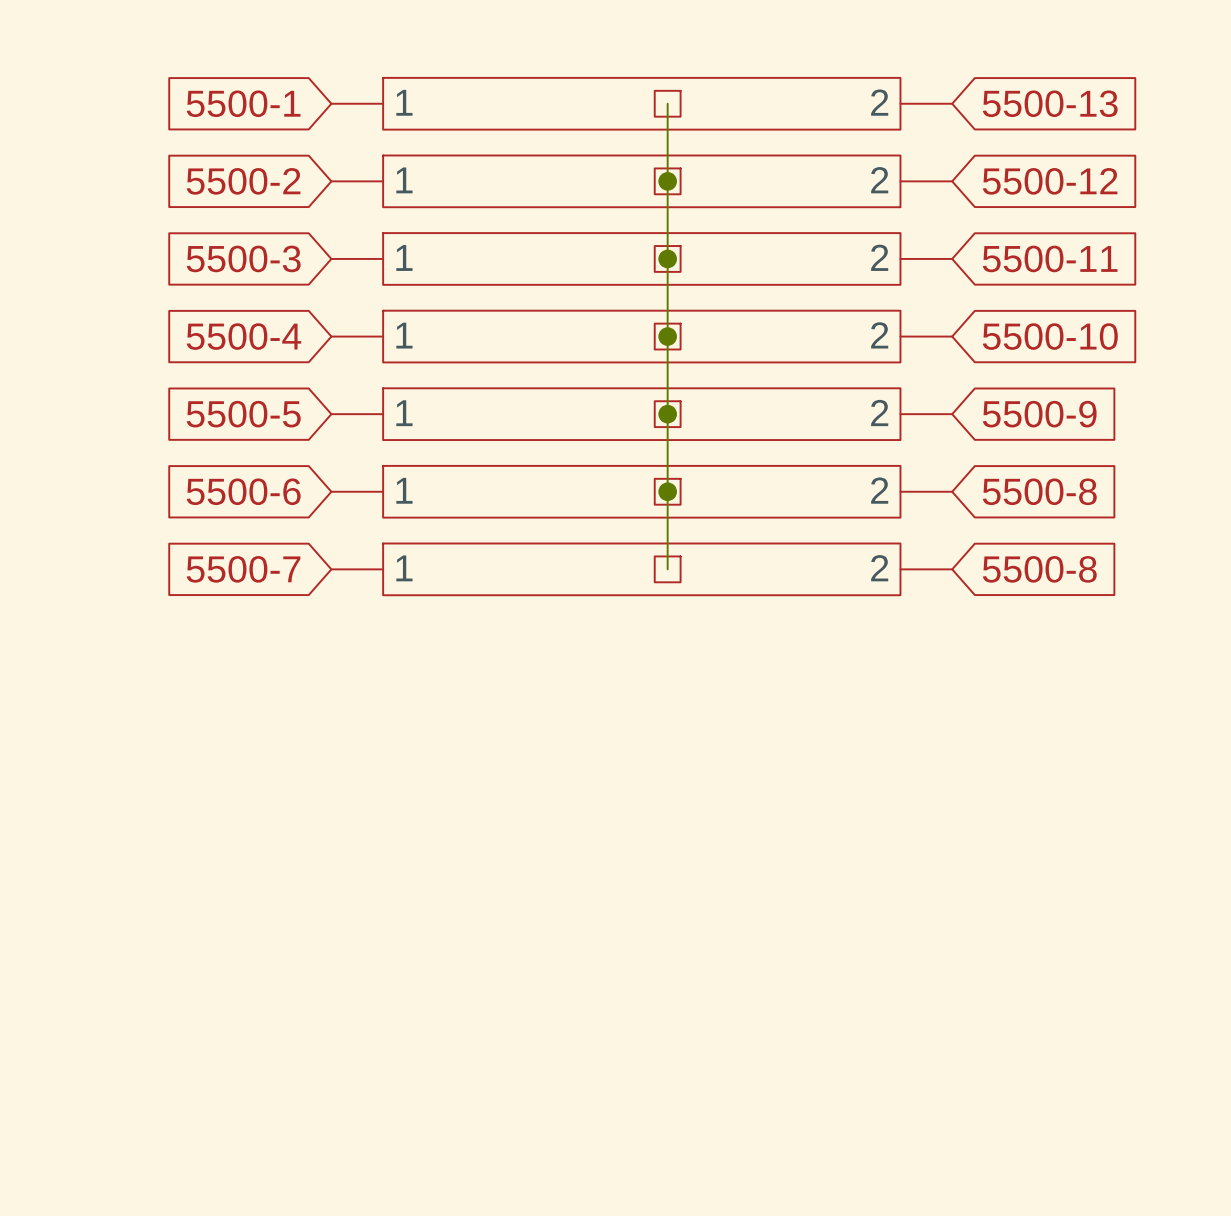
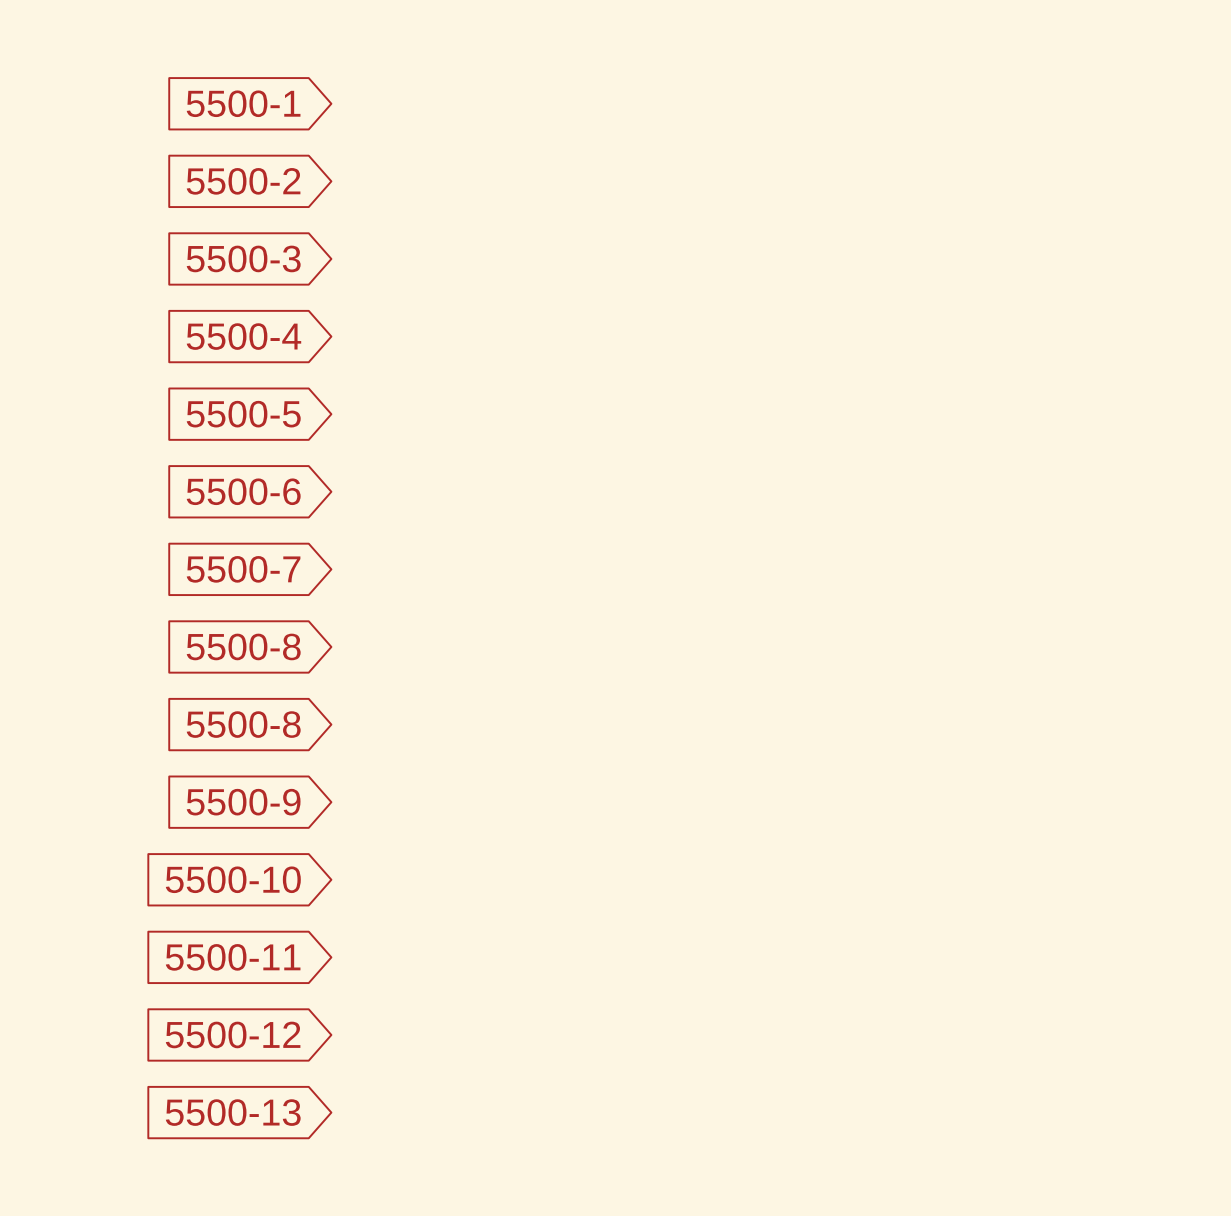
part: (641, 103) -> none
wire: (667, 103) (667, 569) -> none
global label: 5500-13 (1050, 103) -> none
part: (641, 181) -> none
junction: (667, 181) -> none
global label: 5500-12 (1050, 181) -> none
part: (641, 258) -> none
junction: (667, 258) -> none
global label: 5500-11 (1050, 258) -> none
part: (641, 336) -> none
junction: (667, 336) -> none
global label: 5500-10 (1050, 336) -> none
part: (641, 414) -> none
junction: (667, 414) -> none
global label: 5500-9 (1039, 414) -> none
part: (641, 491) -> none
junction: (667, 491) -> none
global label: 5500-8 (1039, 491) -> none
part: (641, 569) -> none
global label: 5500-8 (1039, 569) -> none
global label: none -> 5500-8 (243, 646)
global label: none -> 5500-8 (243, 724)
global label: none -> 5500-9 (243, 802)
global label: none -> 5500-10 (233, 879)
global label: none -> 5500-11 (233, 957)
global label: none -> 5500-12 (233, 1034)
global label: none -> 5500-13 (233, 1112)

